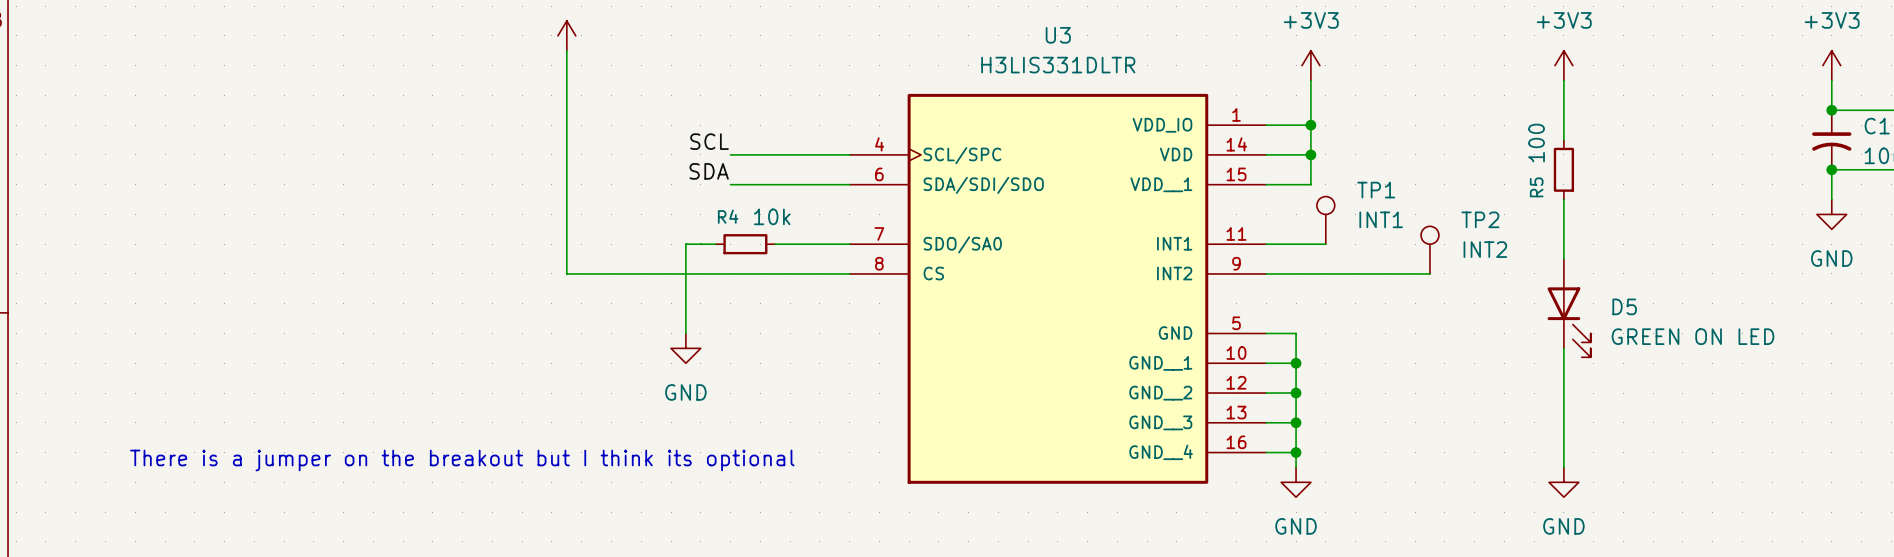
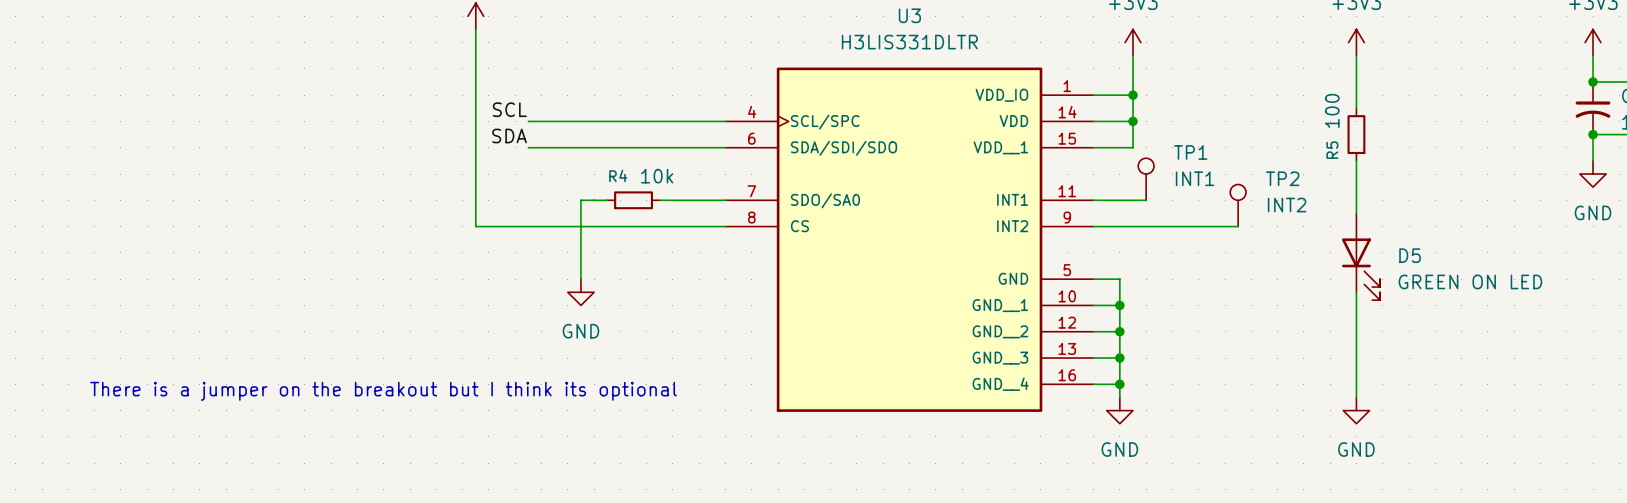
label position: SCL (709, 141) -> SCL (509, 109)
wire: none -> (528, 121) (620, 121)
label position: SDA (709, 171) -> SDA (509, 135)
wire: none -> (528, 147) (620, 147)

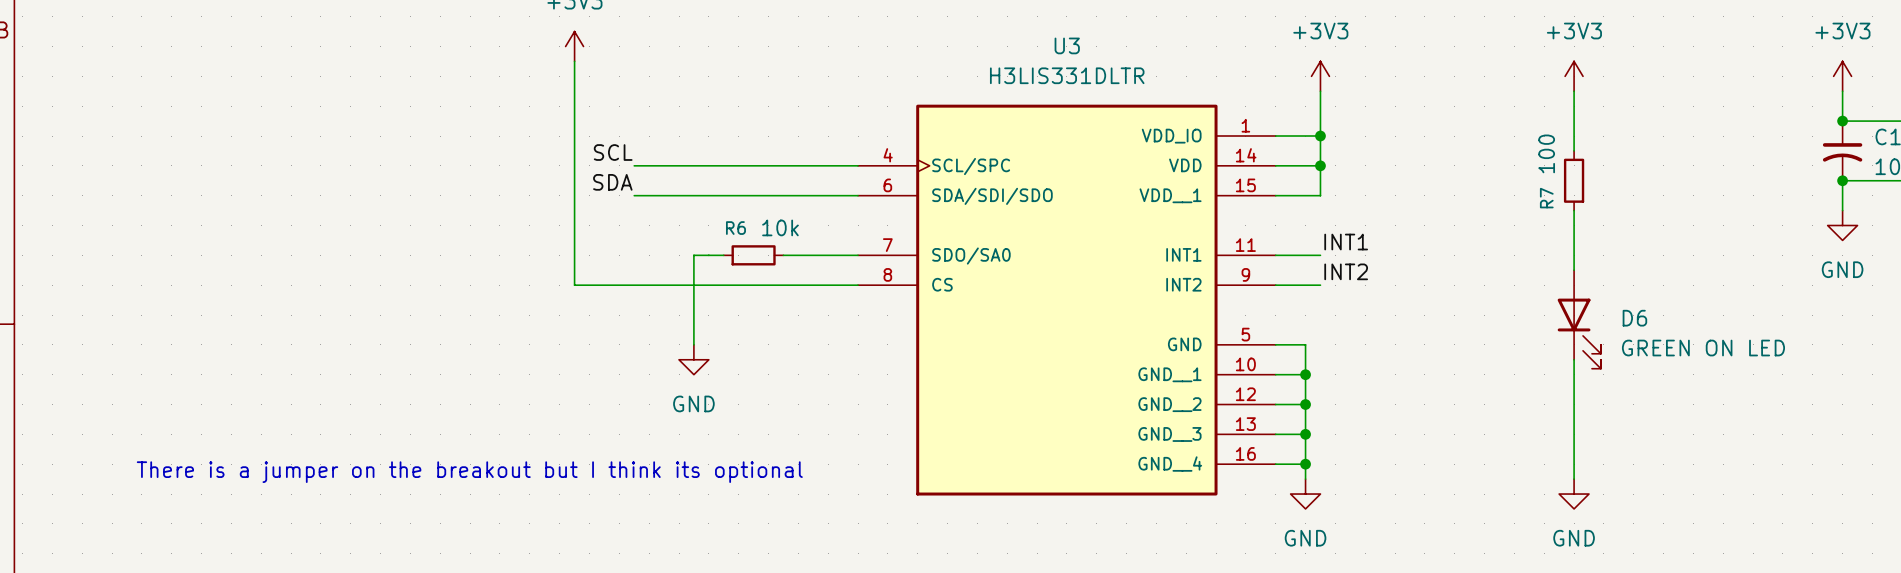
R5 name: R5 (1332, 150) -> R7 (1546, 198)
R4 name: R4 (618, 175) -> R6 (735, 228)
TP1: INT1 (1146, 179) -> none
label: none -> INT1 (1346, 242)
wire: (1132, 200) (1146, 200) -> none
TP2: INT2 (1238, 205) -> none
label: none -> INT2 (1346, 271)
wire: (1132, 226) (1238, 226) -> none
D5 name: D5 (1410, 255) -> D6 (1634, 318)

